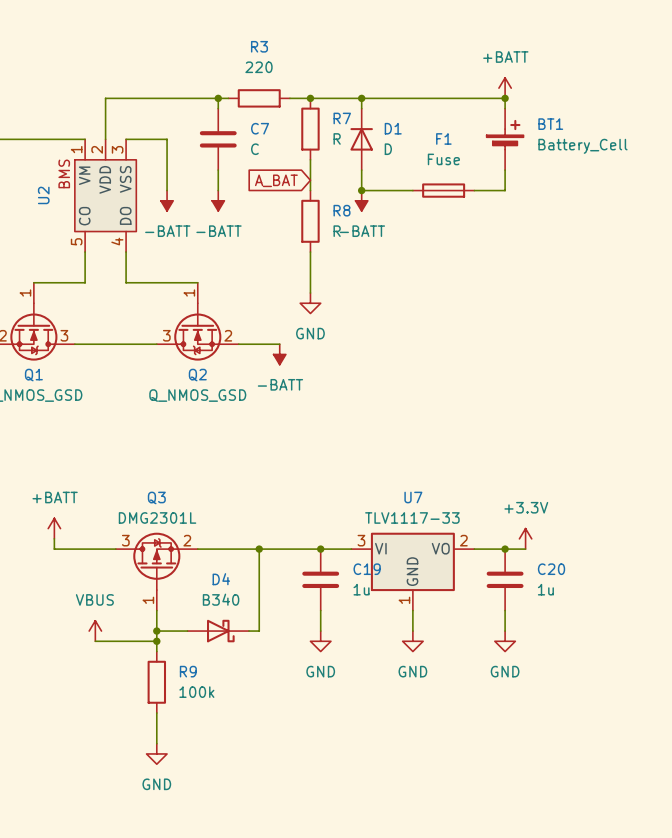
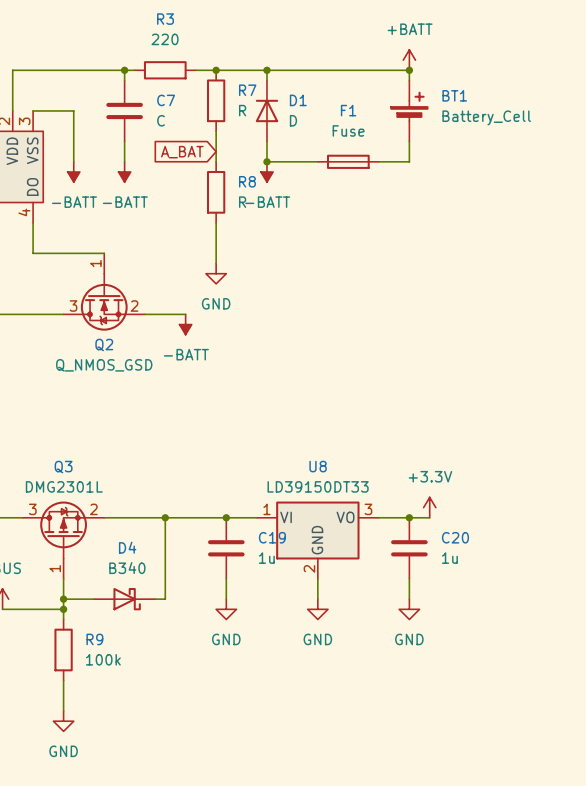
U7 name: U7 (413, 497) -> U8 (318, 466)
U7 value: TLV1117-33 (412, 517) -> LD39150DT33 (318, 486)
U7 pin number: 3 (361, 540) -> 1 (266, 509)
U7 pin number: 2 (463, 540) -> 3 (368, 509)
U7 pin number: 1 (404, 600) -> 2 (309, 568)

